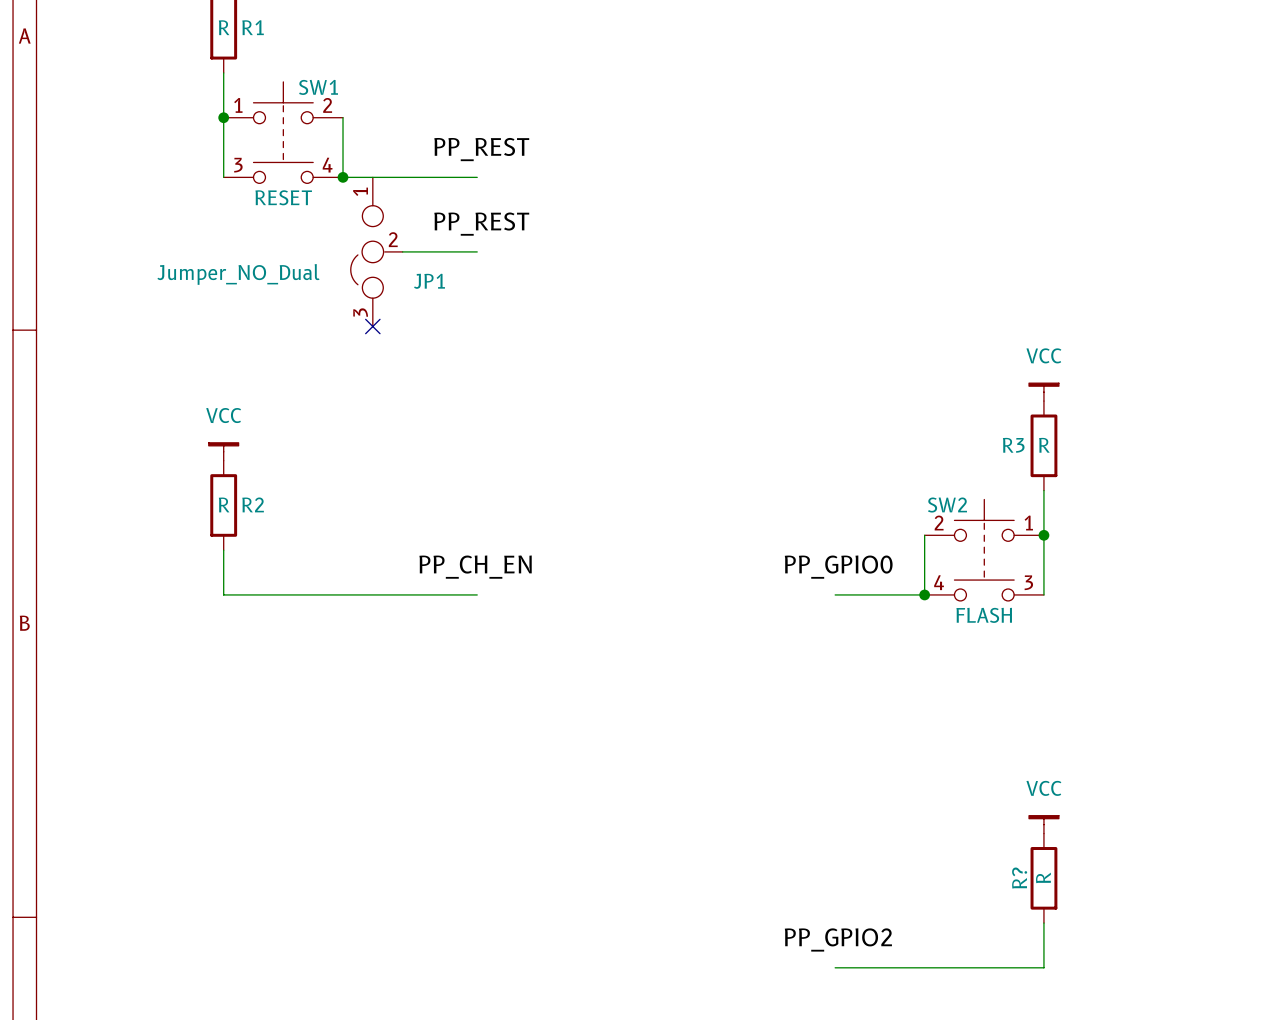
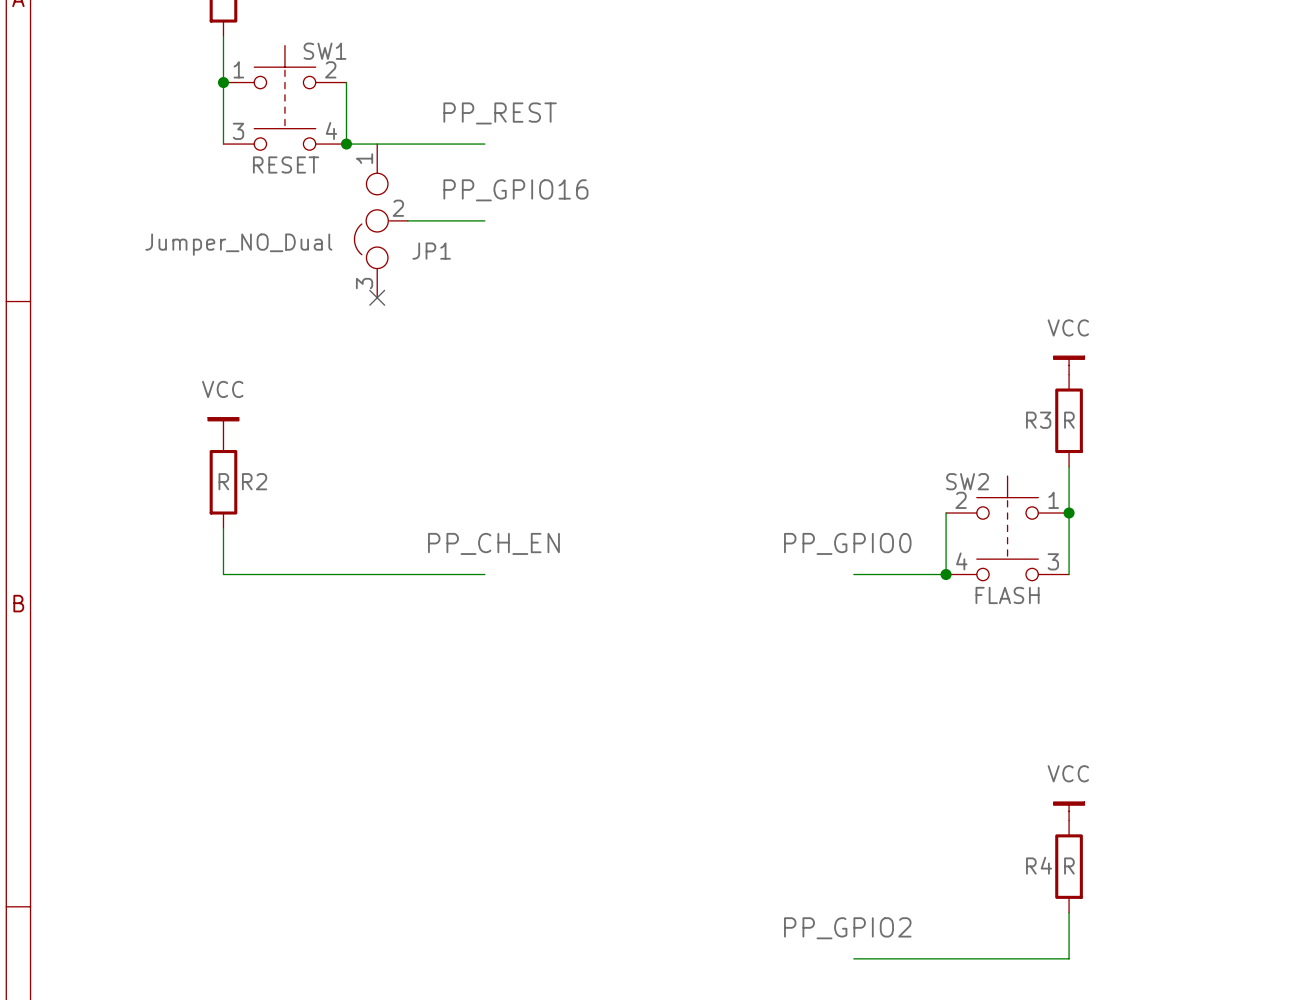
label: PP_REST (481, 224) -> PP_GPIO16 (515, 190)
R? value rotation: 0° (1043, 877) -> 90° clockwise (1069, 866)
R? name: R? (1019, 878) -> R4 (1039, 865)

